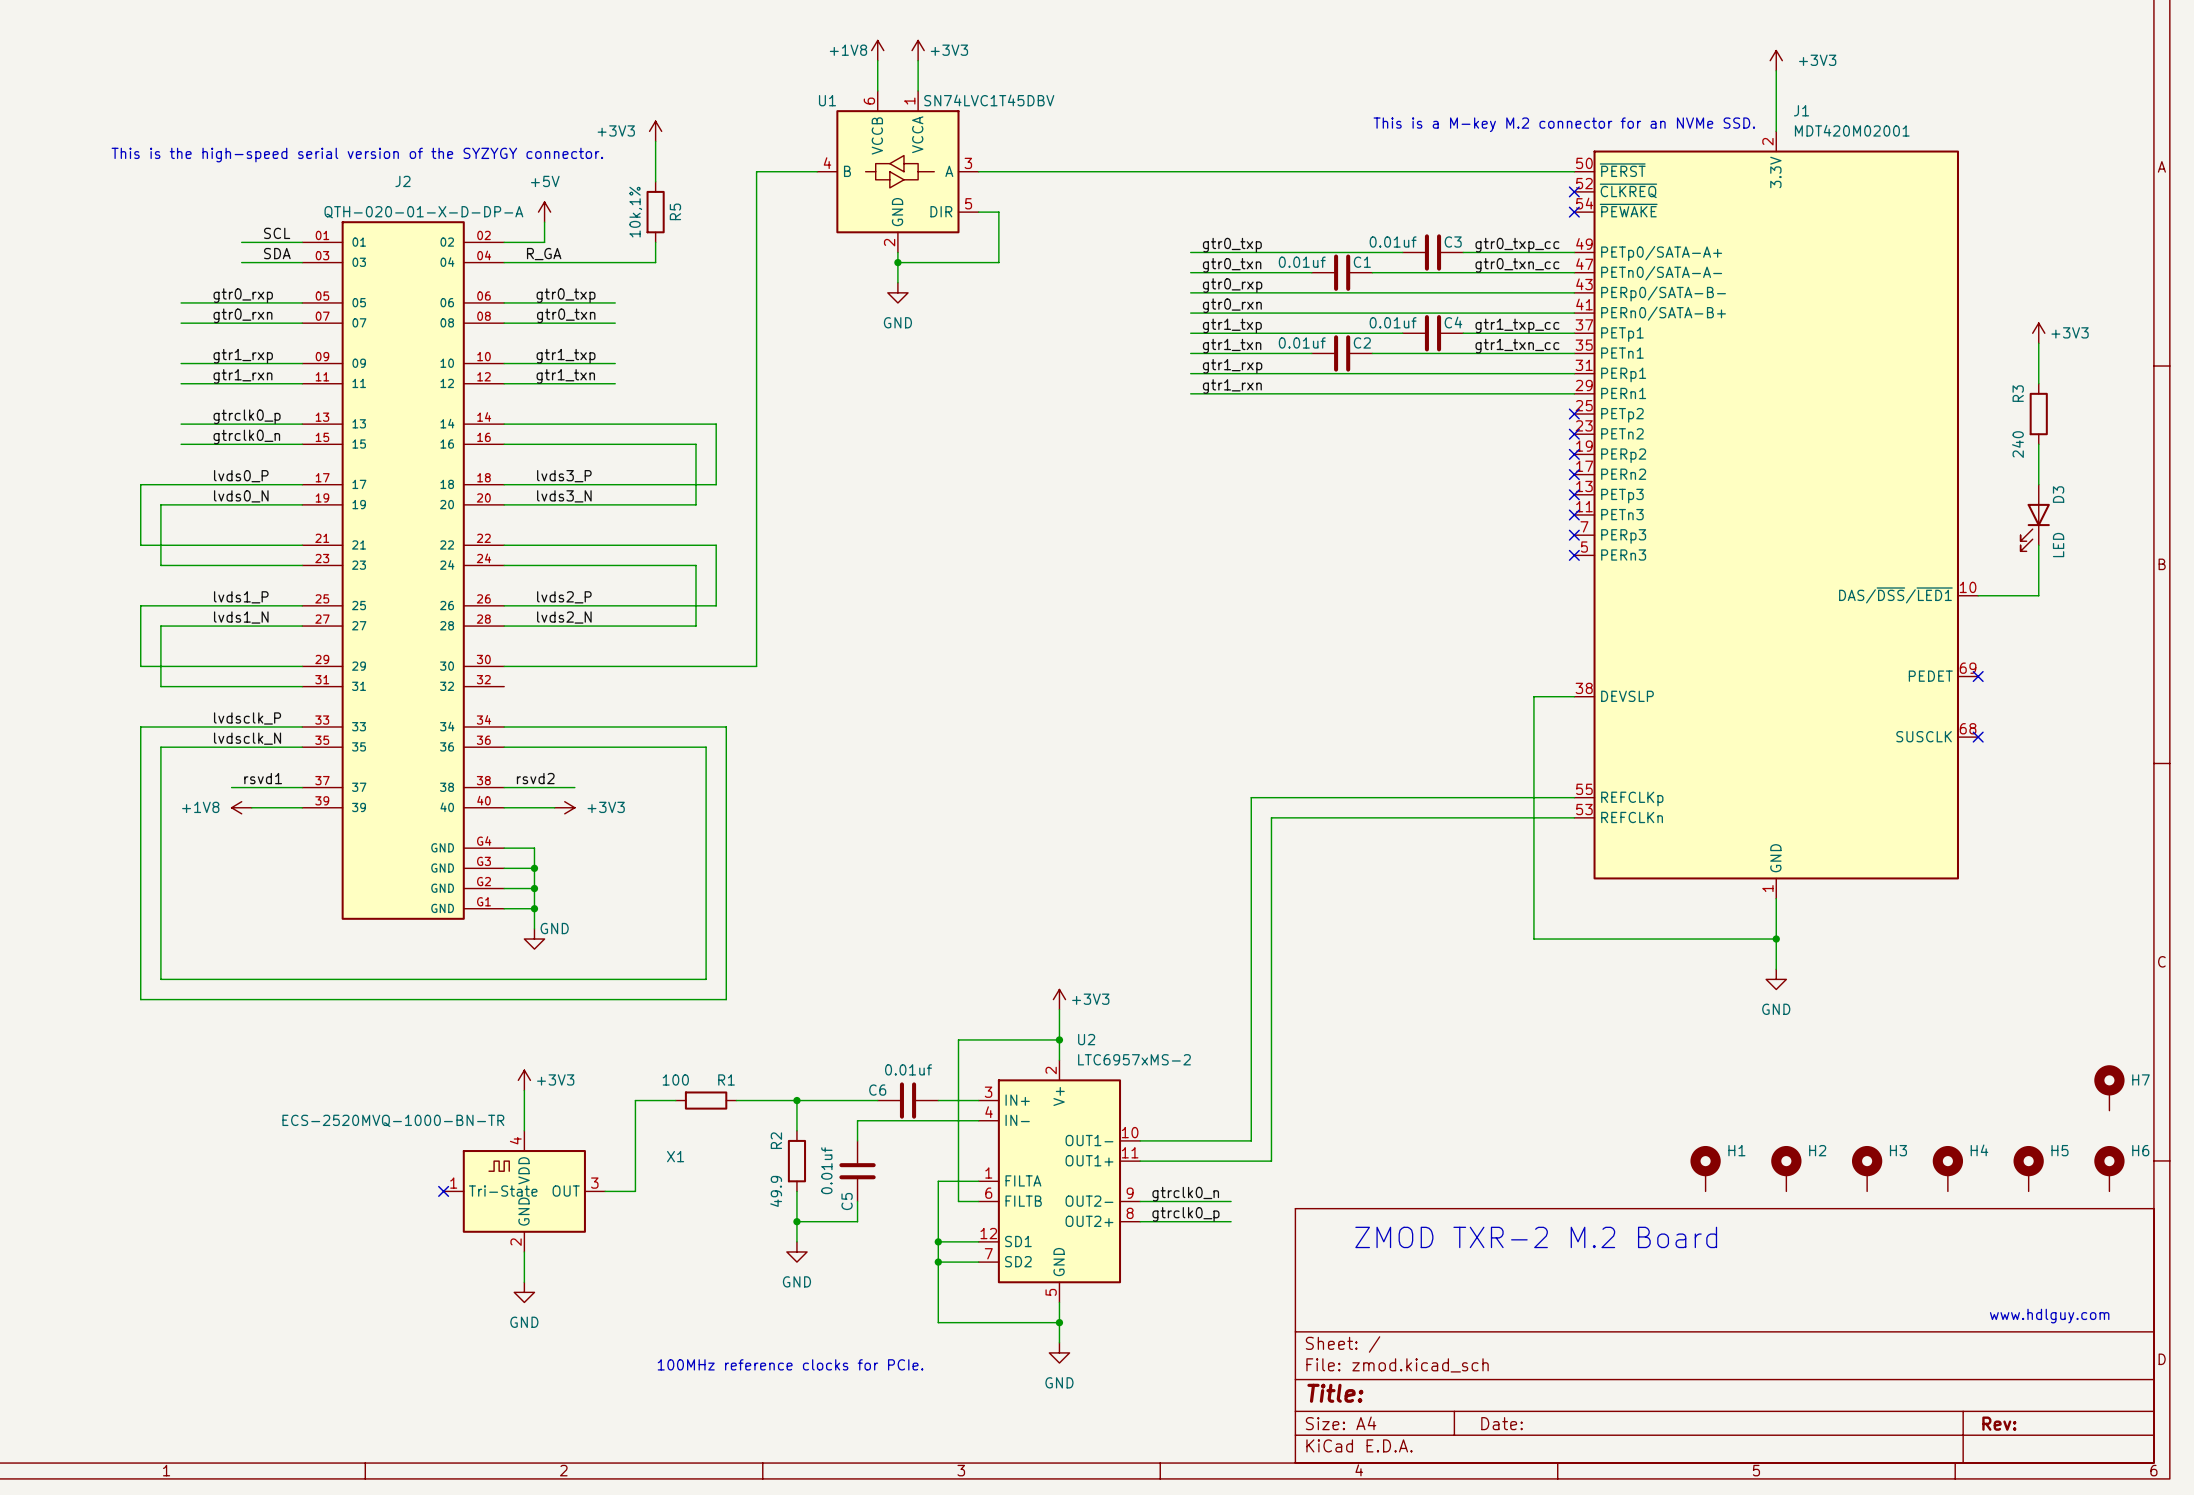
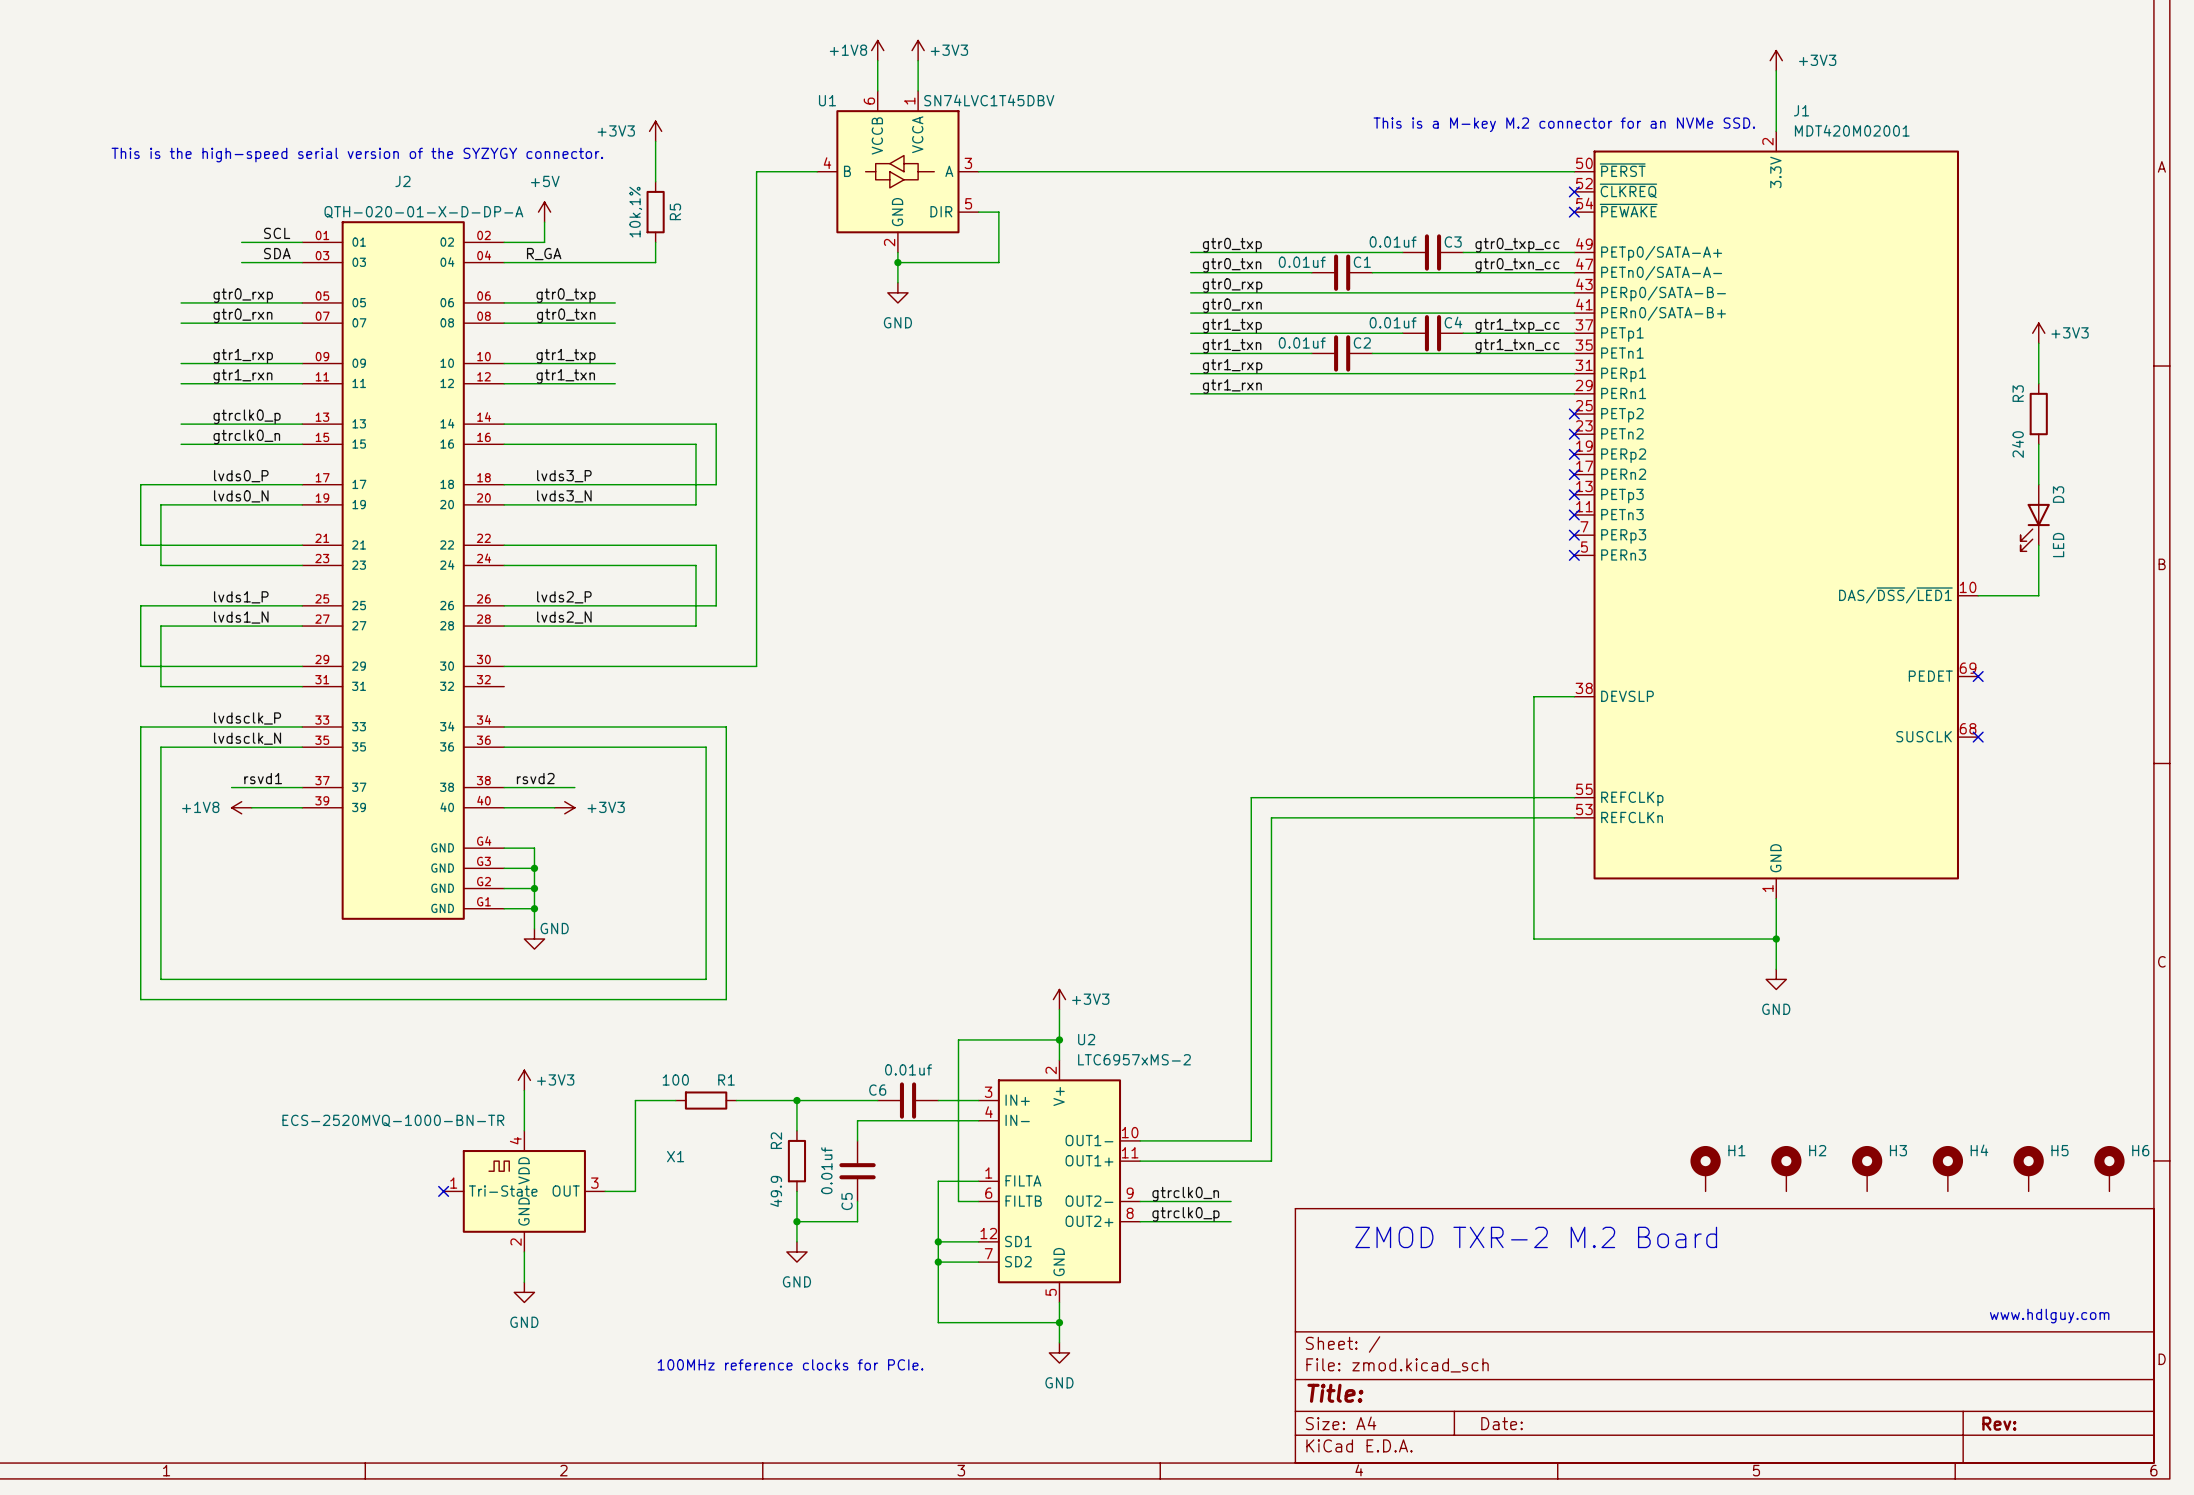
H7: (2109, 1087) -> none

